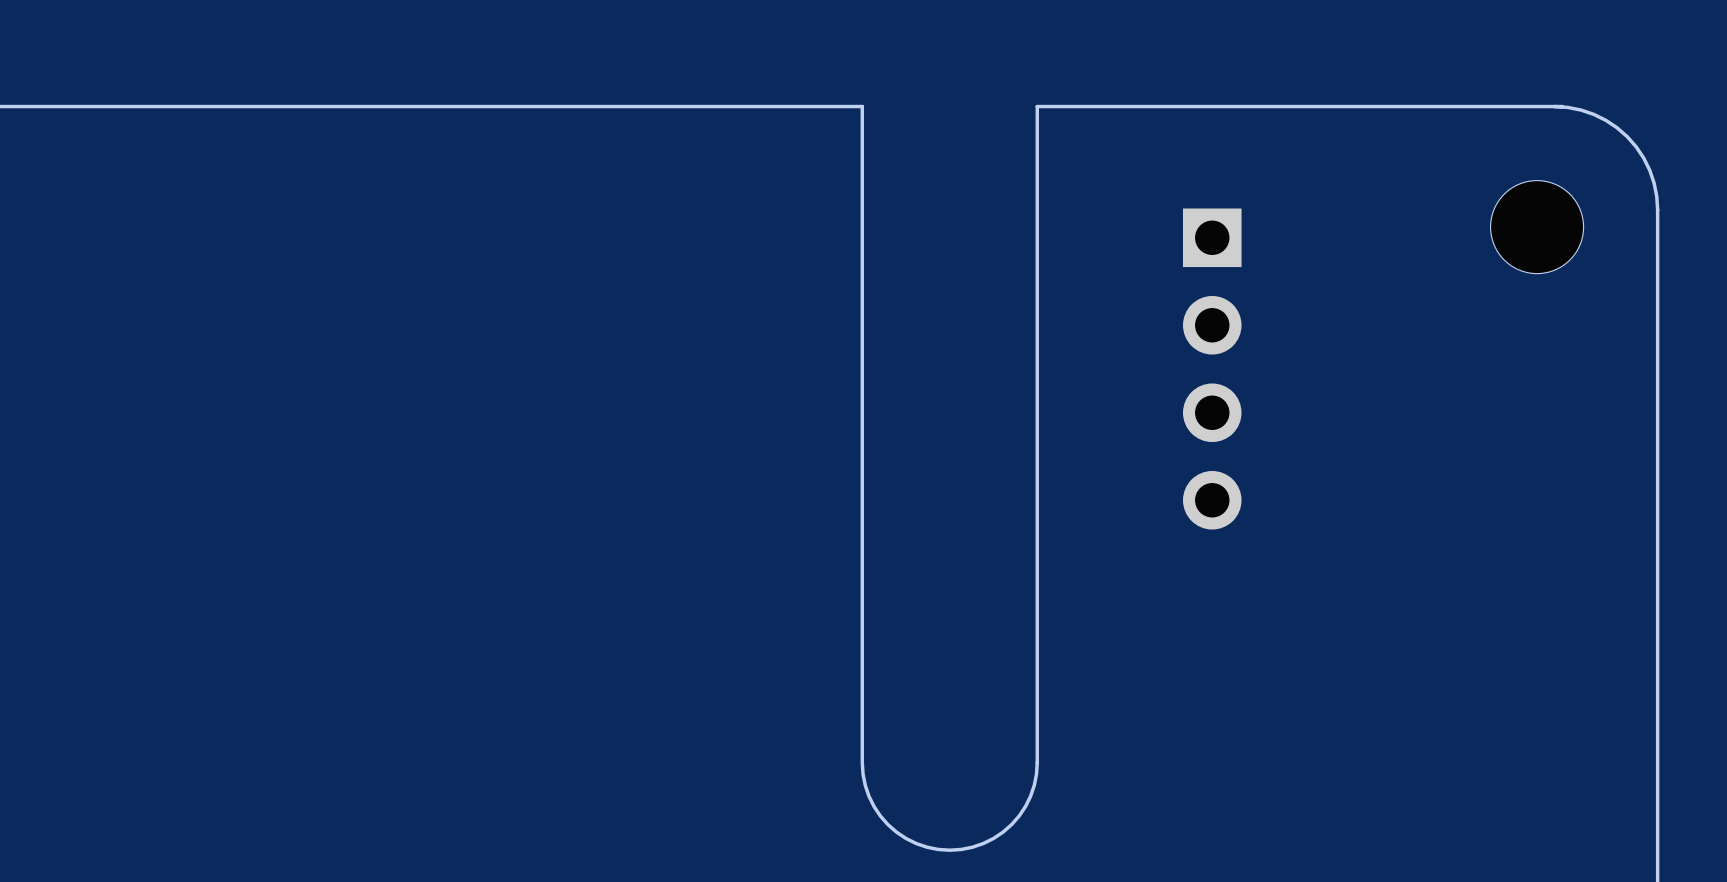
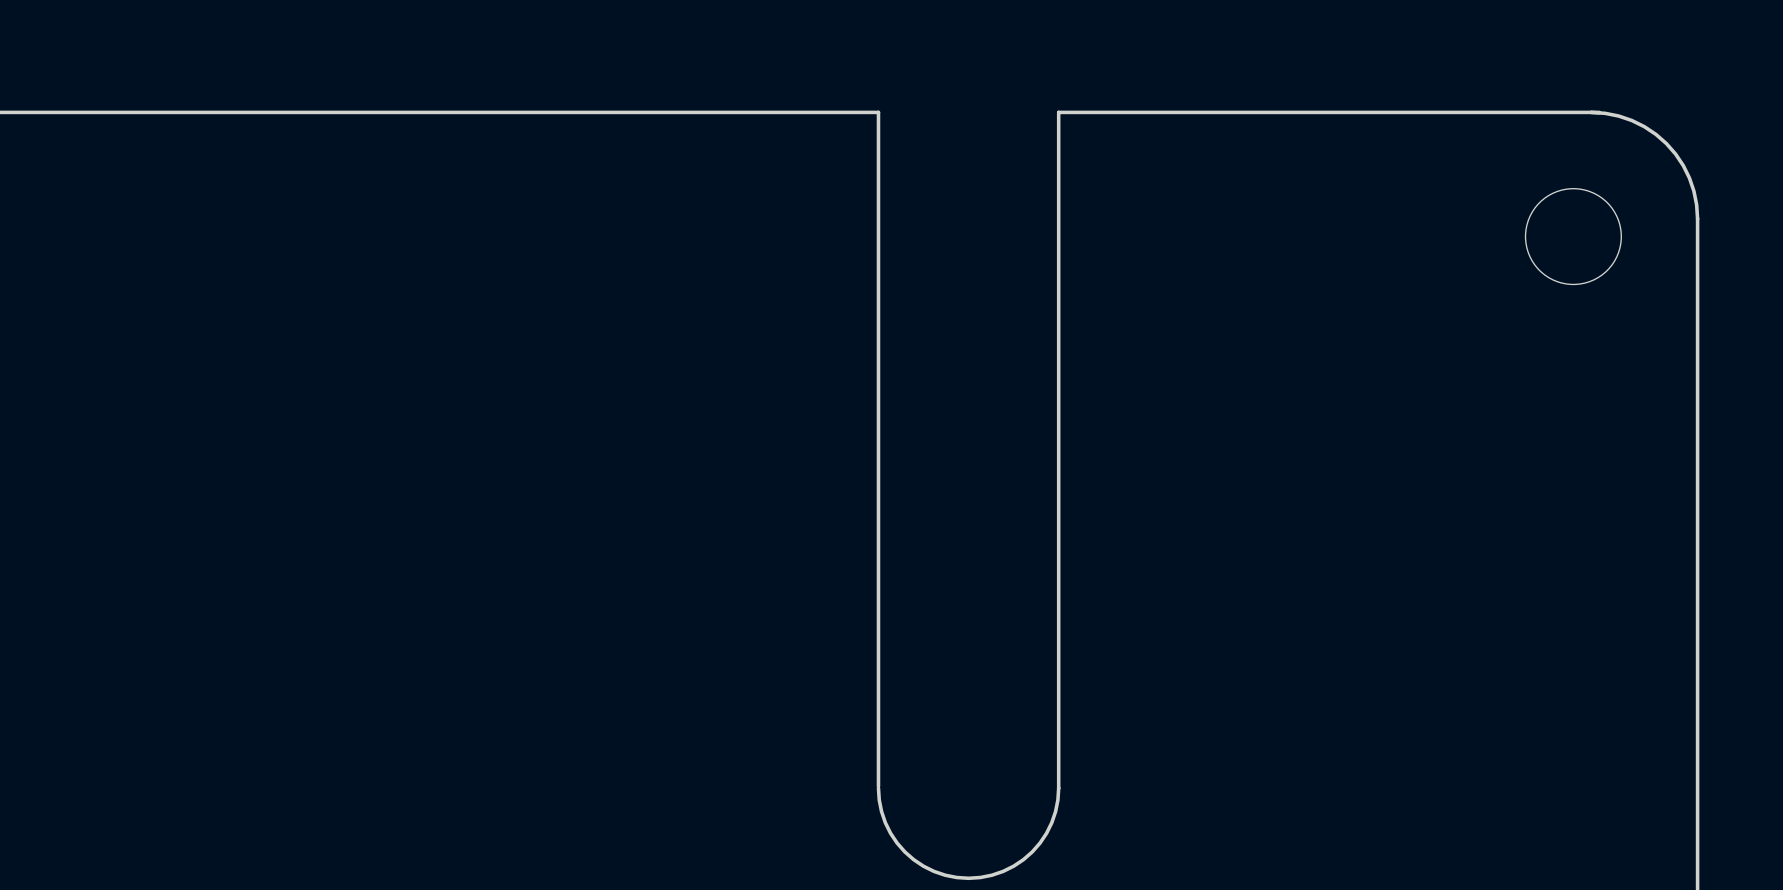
part: (1212, 369) -> none

